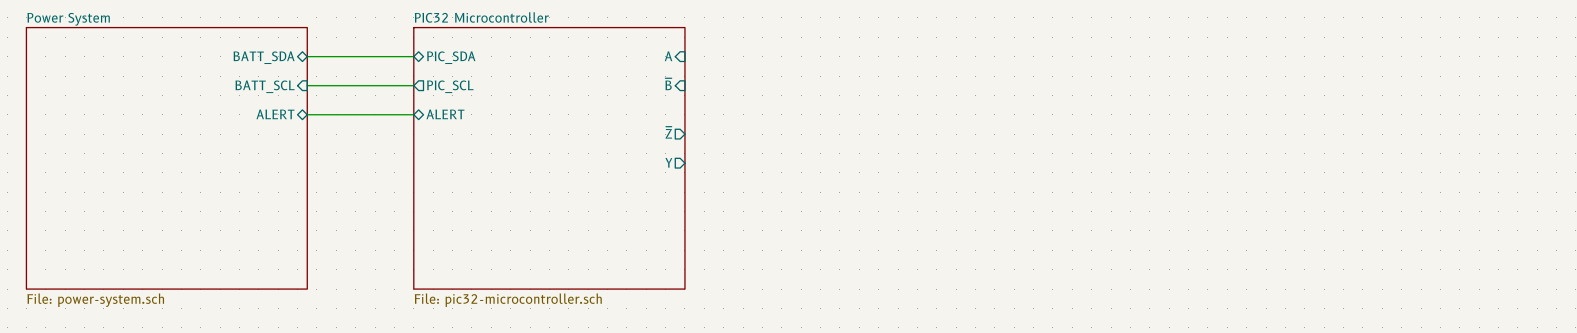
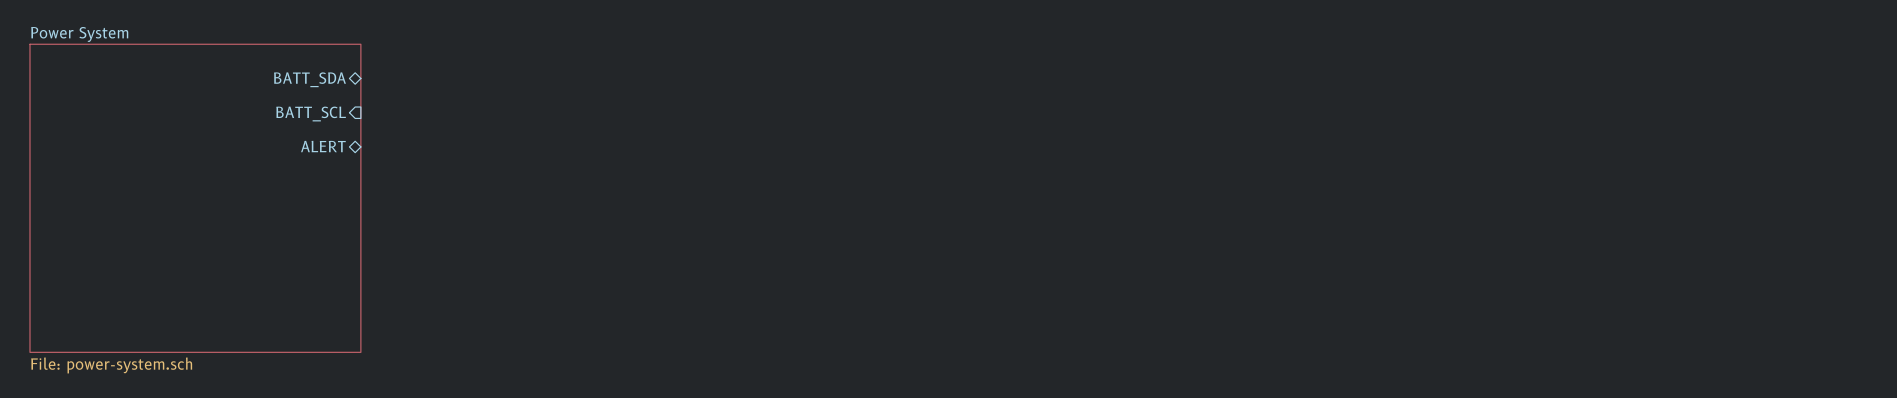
wire: (307, 56) (413, 56) -> none
sheet pin: A (668, 56) -> none
sheet pin: PIC_SDA (451, 57) -> none
sheet pin: ~{B} (668, 84) -> none
wire: (307, 85) (413, 85) -> none
sheet pin: PIC_SCL (450, 86) -> none
wire: (307, 114) (413, 114) -> none
sheet pin: ALERT (445, 114) -> none
sheet pin: ~{Z} (668, 132) -> none
sheet PIC32 Microcontroller: File: pic32-microcontroller.sch (549, 158) -> none
sheet pin: Y (668, 162) -> none

